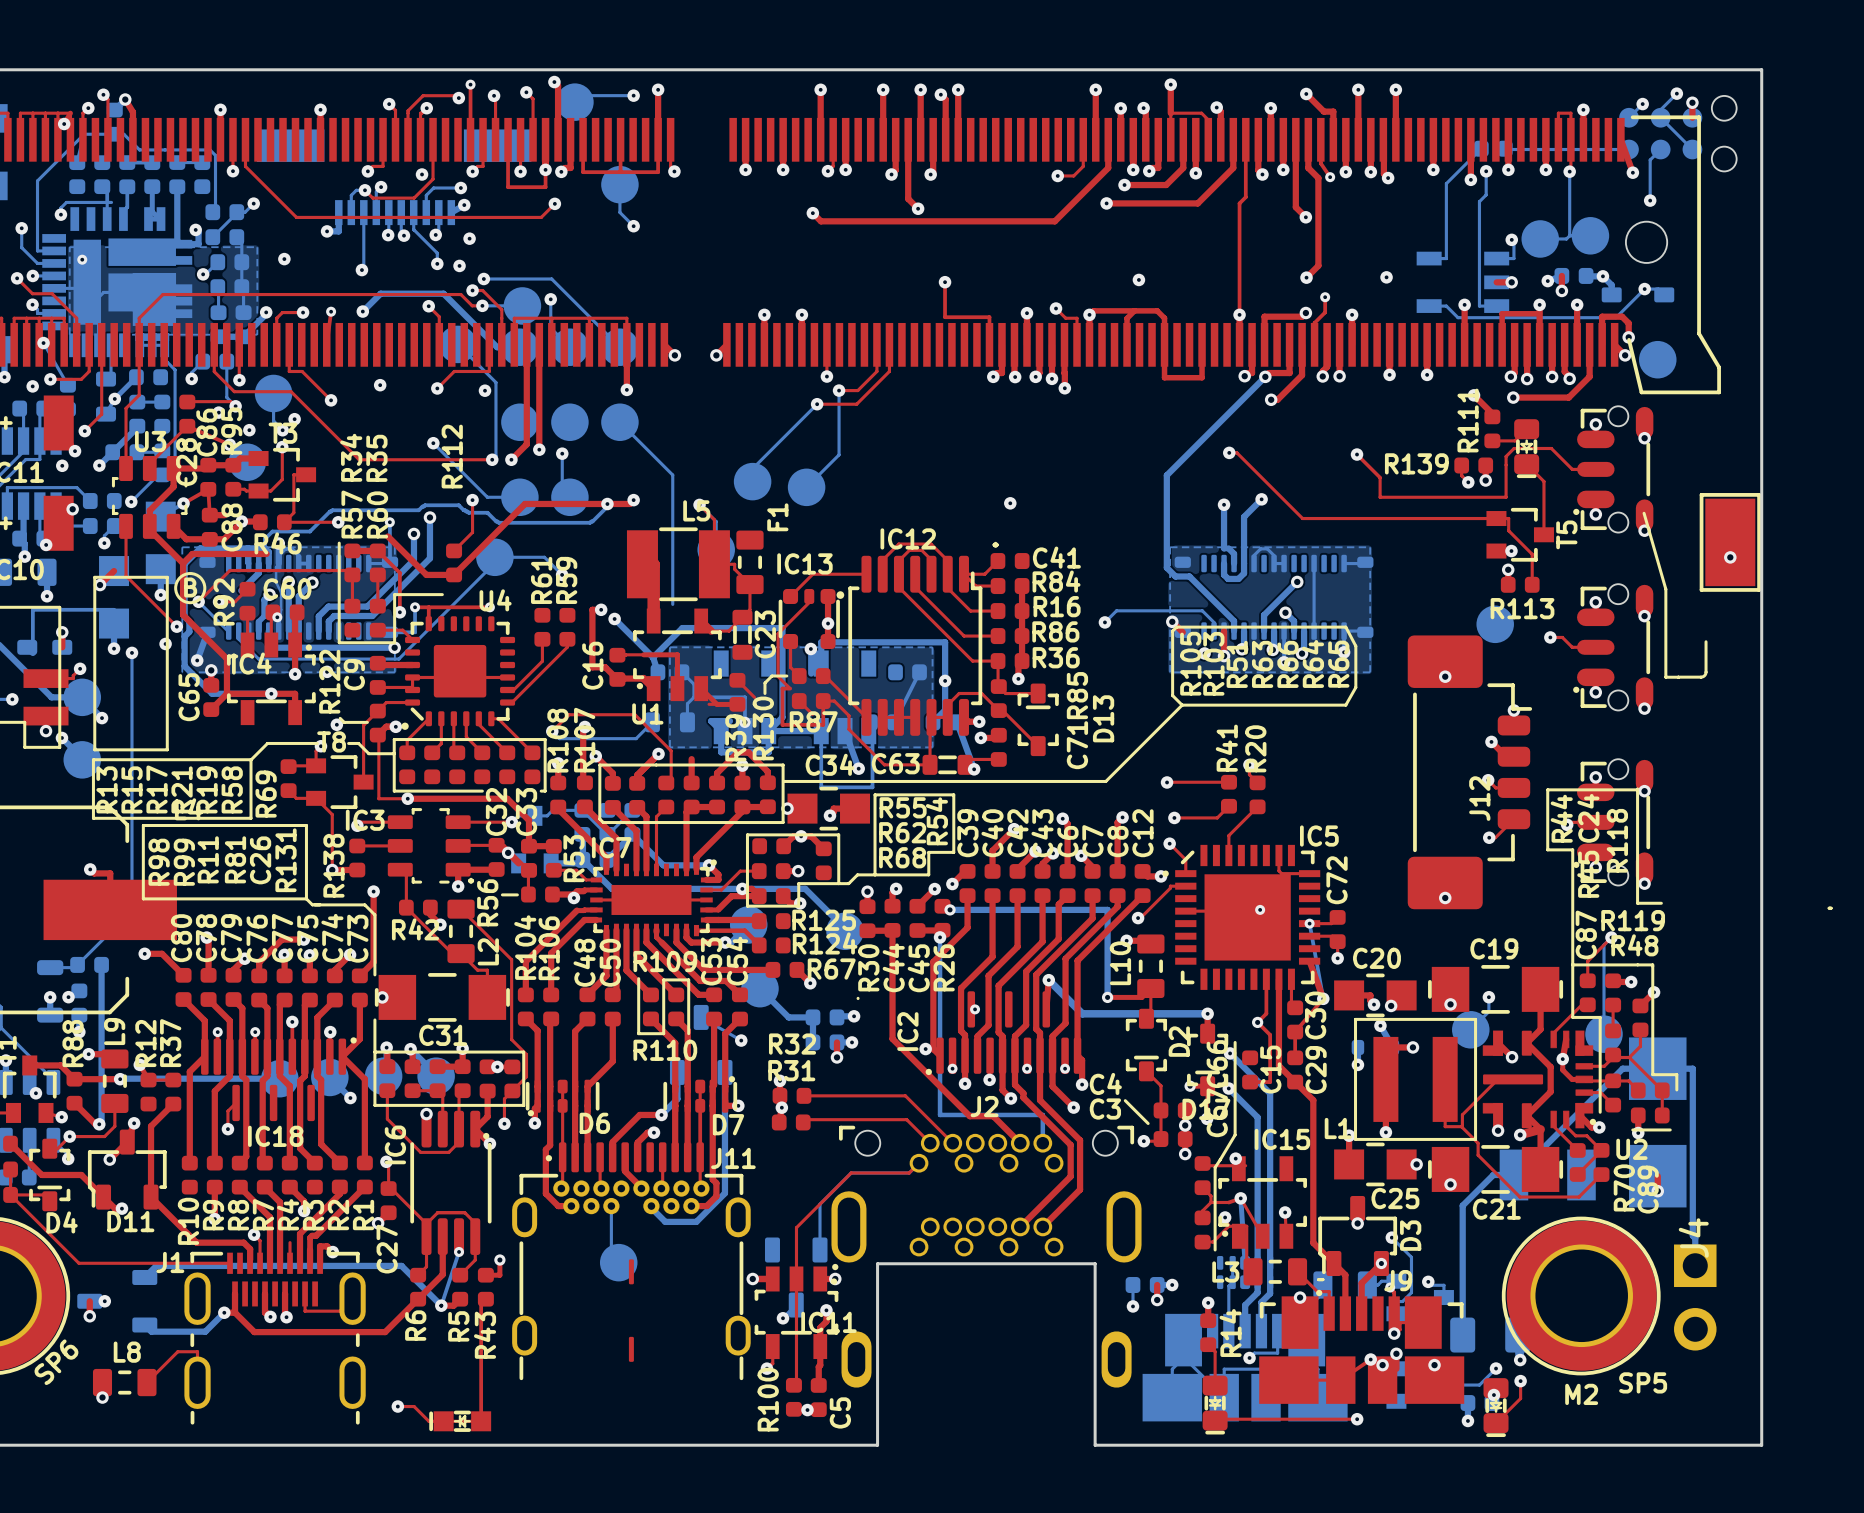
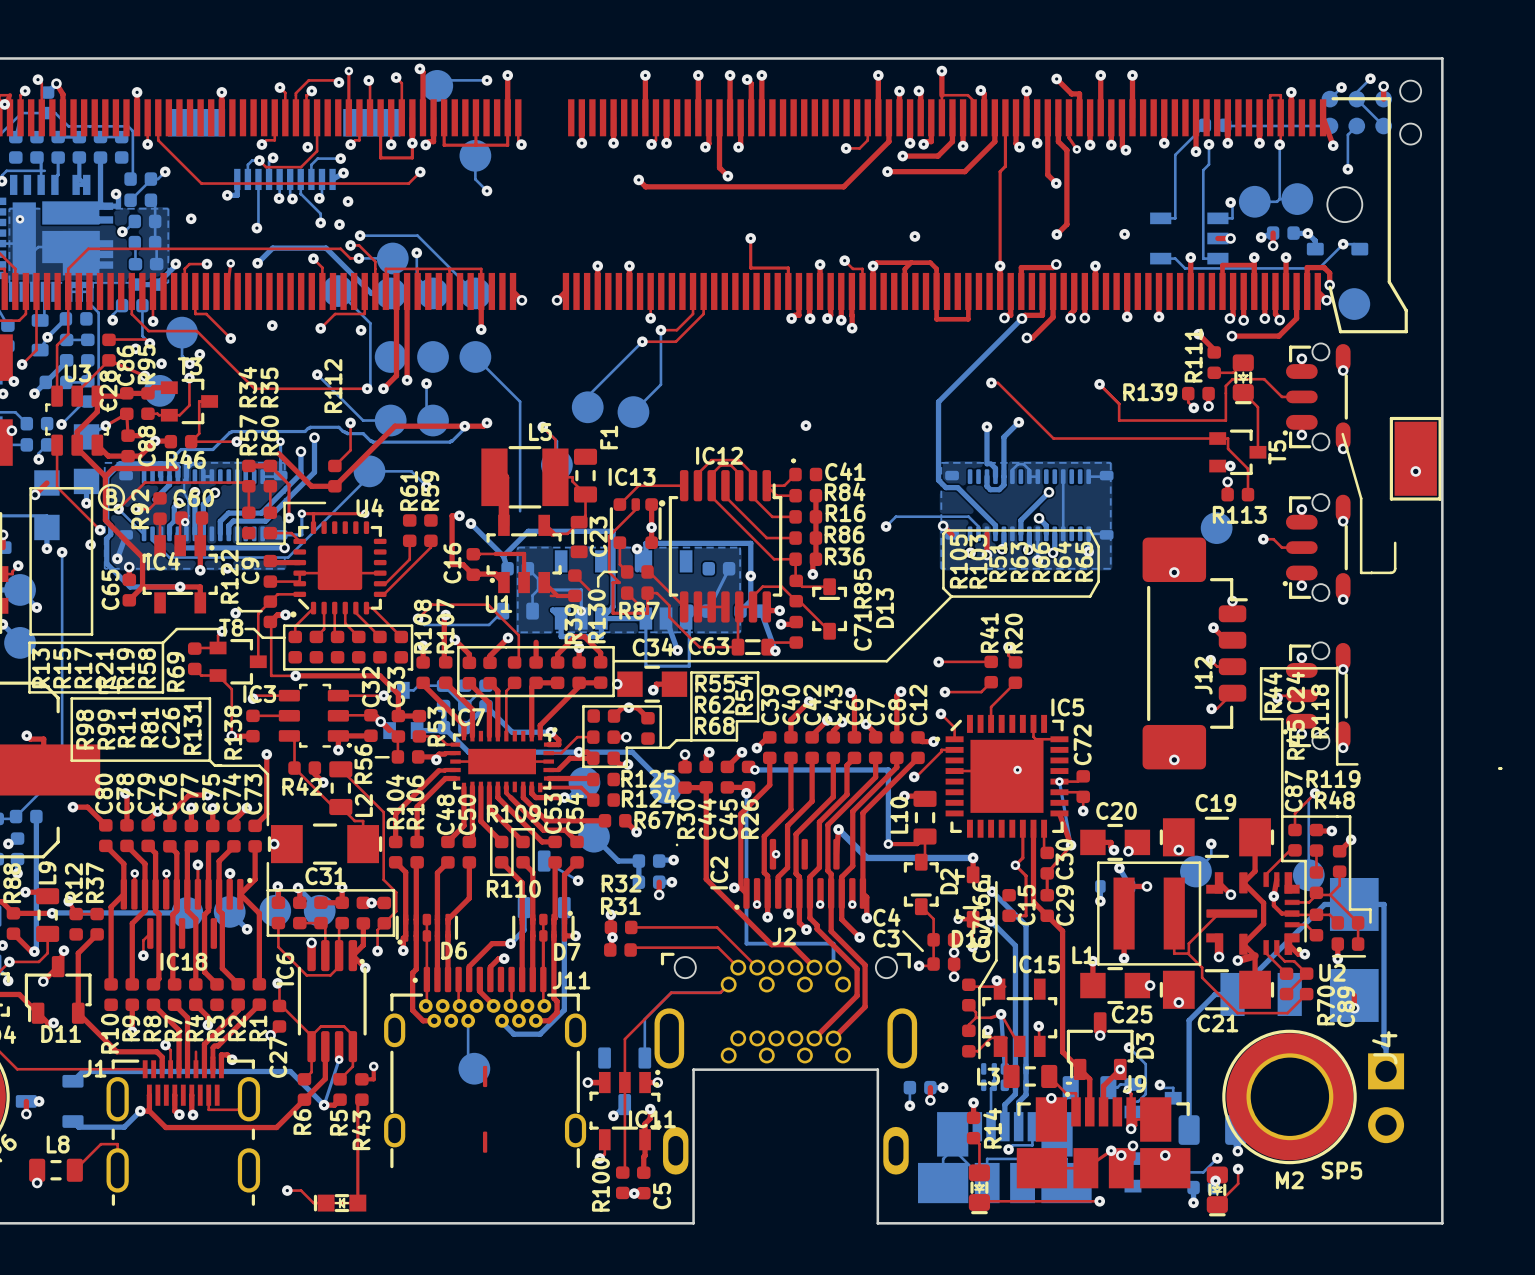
top track: (1325, 297) (1325, 312) (1314, 322) (1314, 344) -> none
via: (1325, 297) -> none

